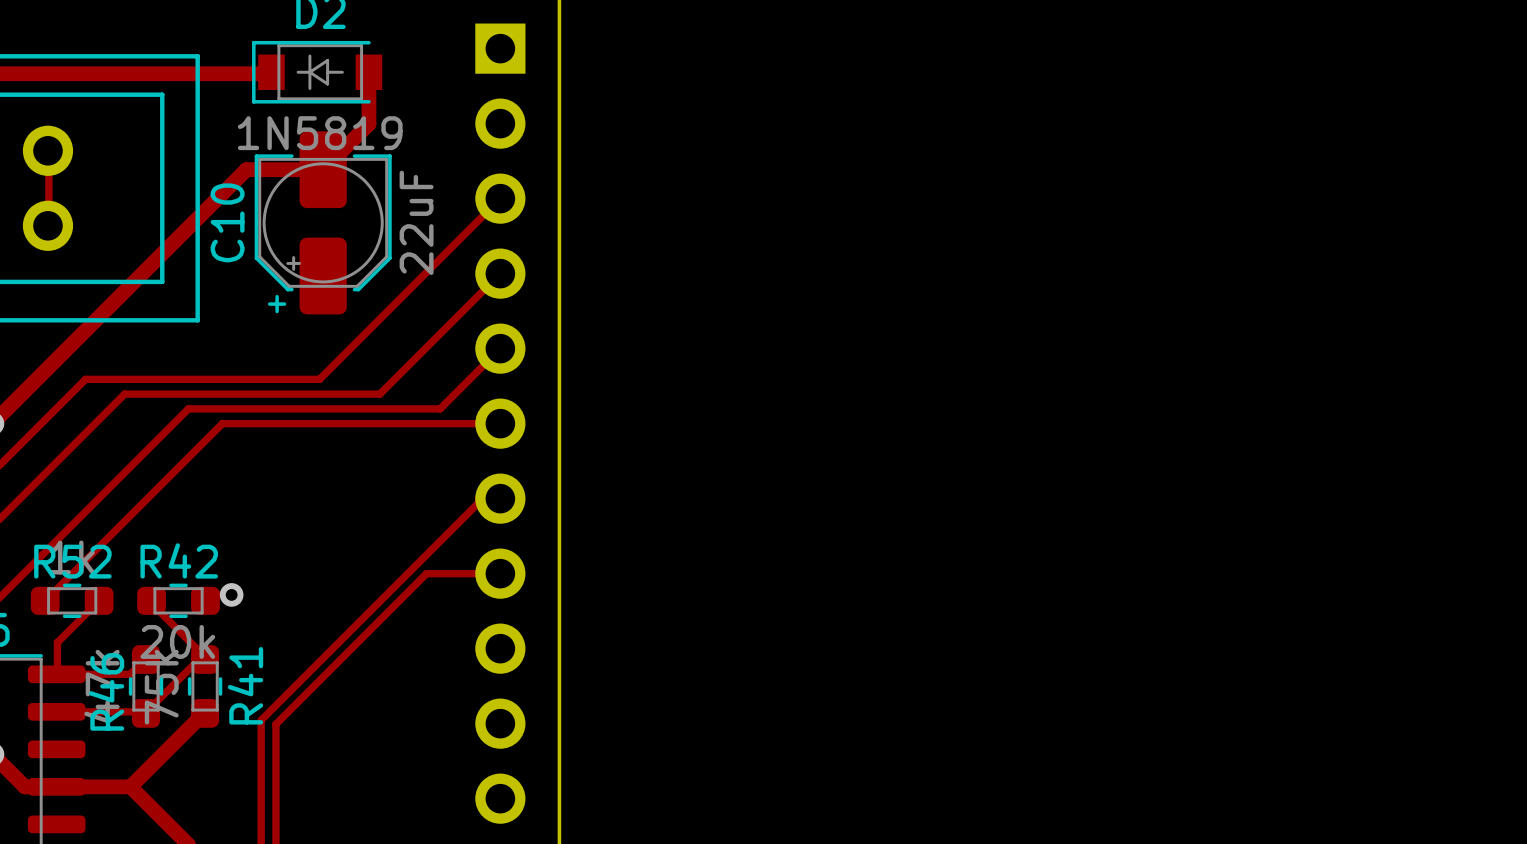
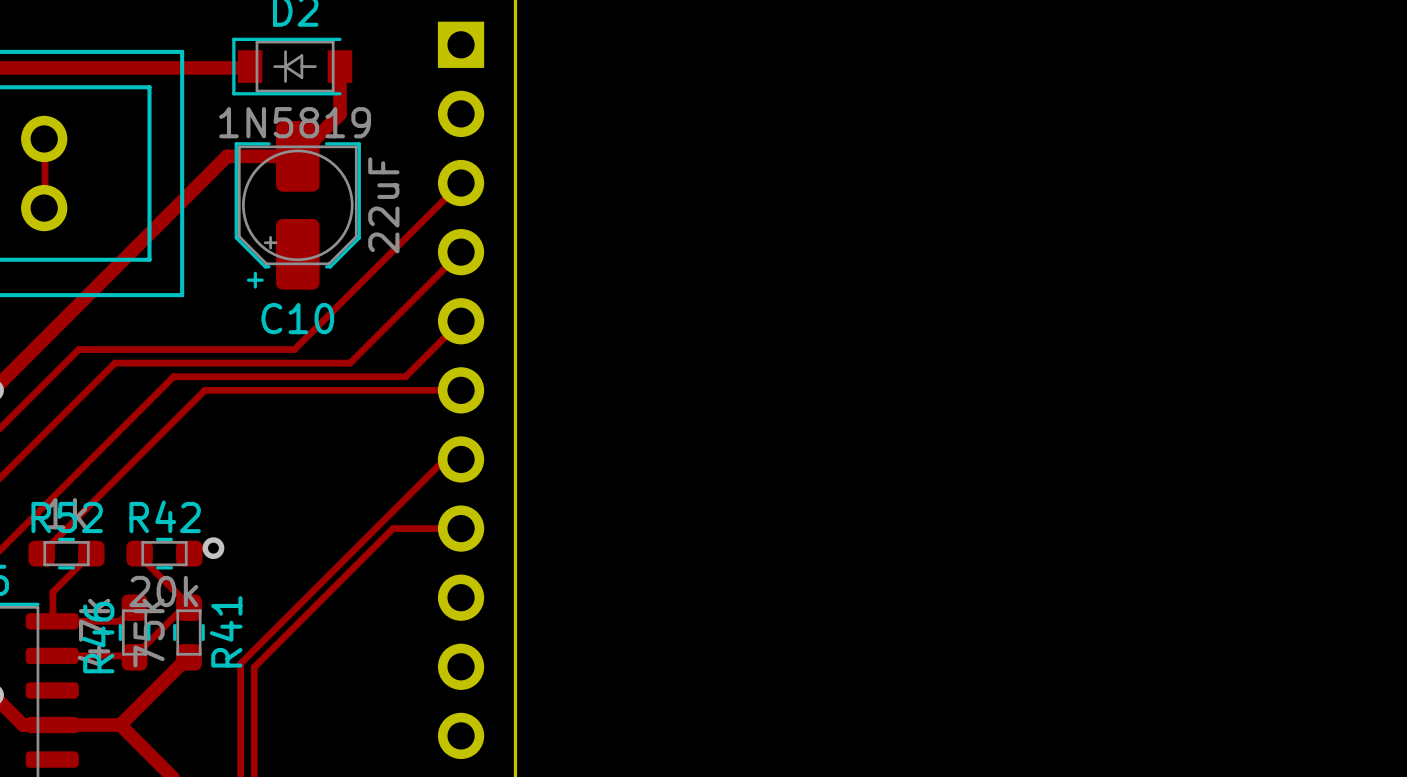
C10 name rotation: 0° (227, 222) -> 90° clockwise (297, 318)
C10 name position: C10 (227, 222) -> C10 (297, 318)

